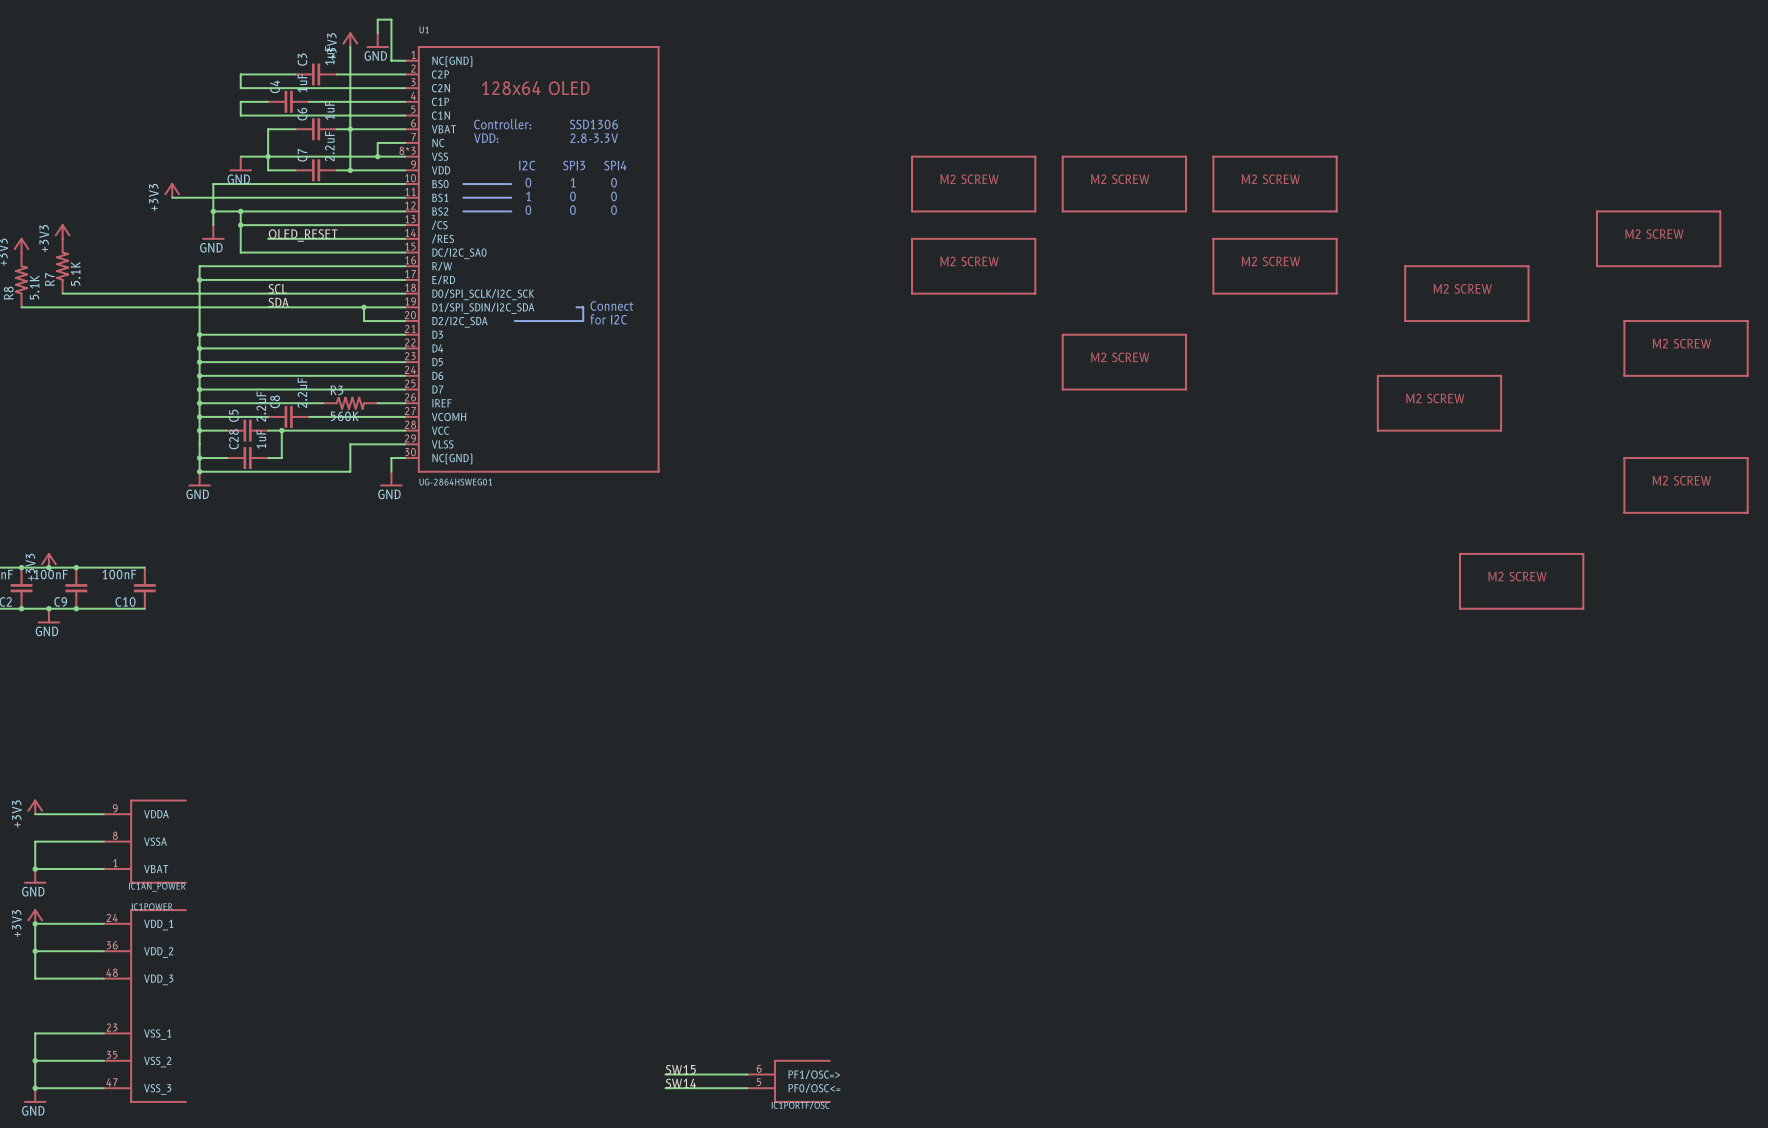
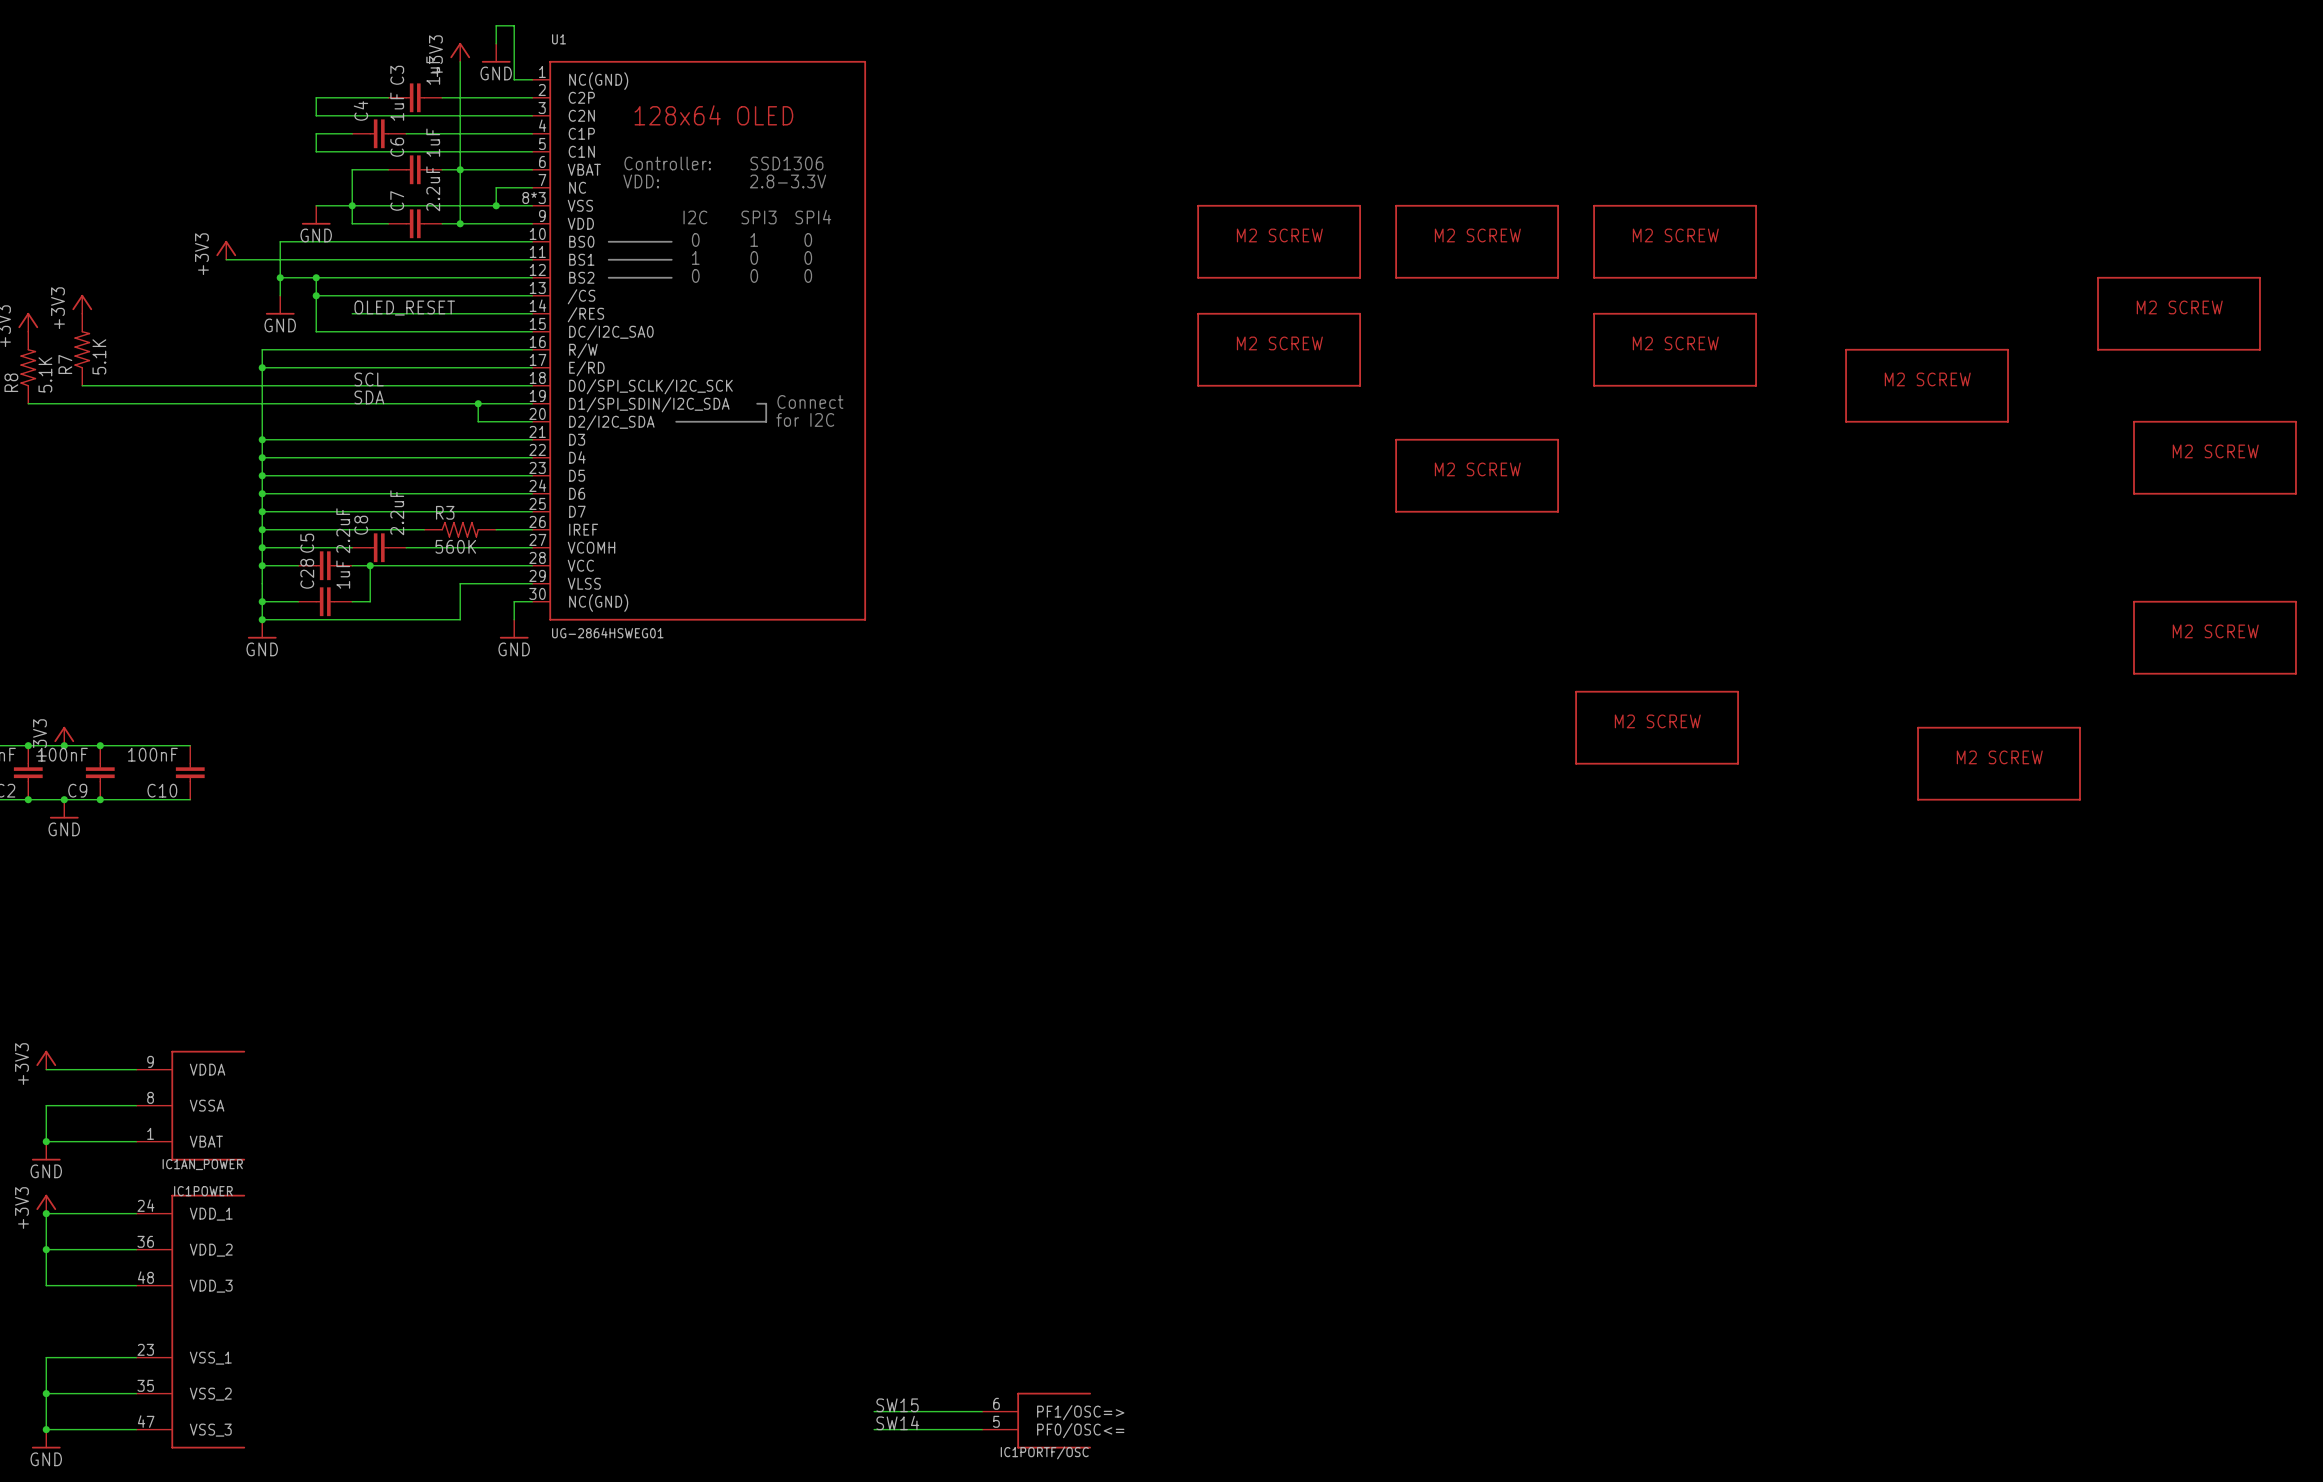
part: (1439, 403) -> none
part: none -> (1657, 727)

